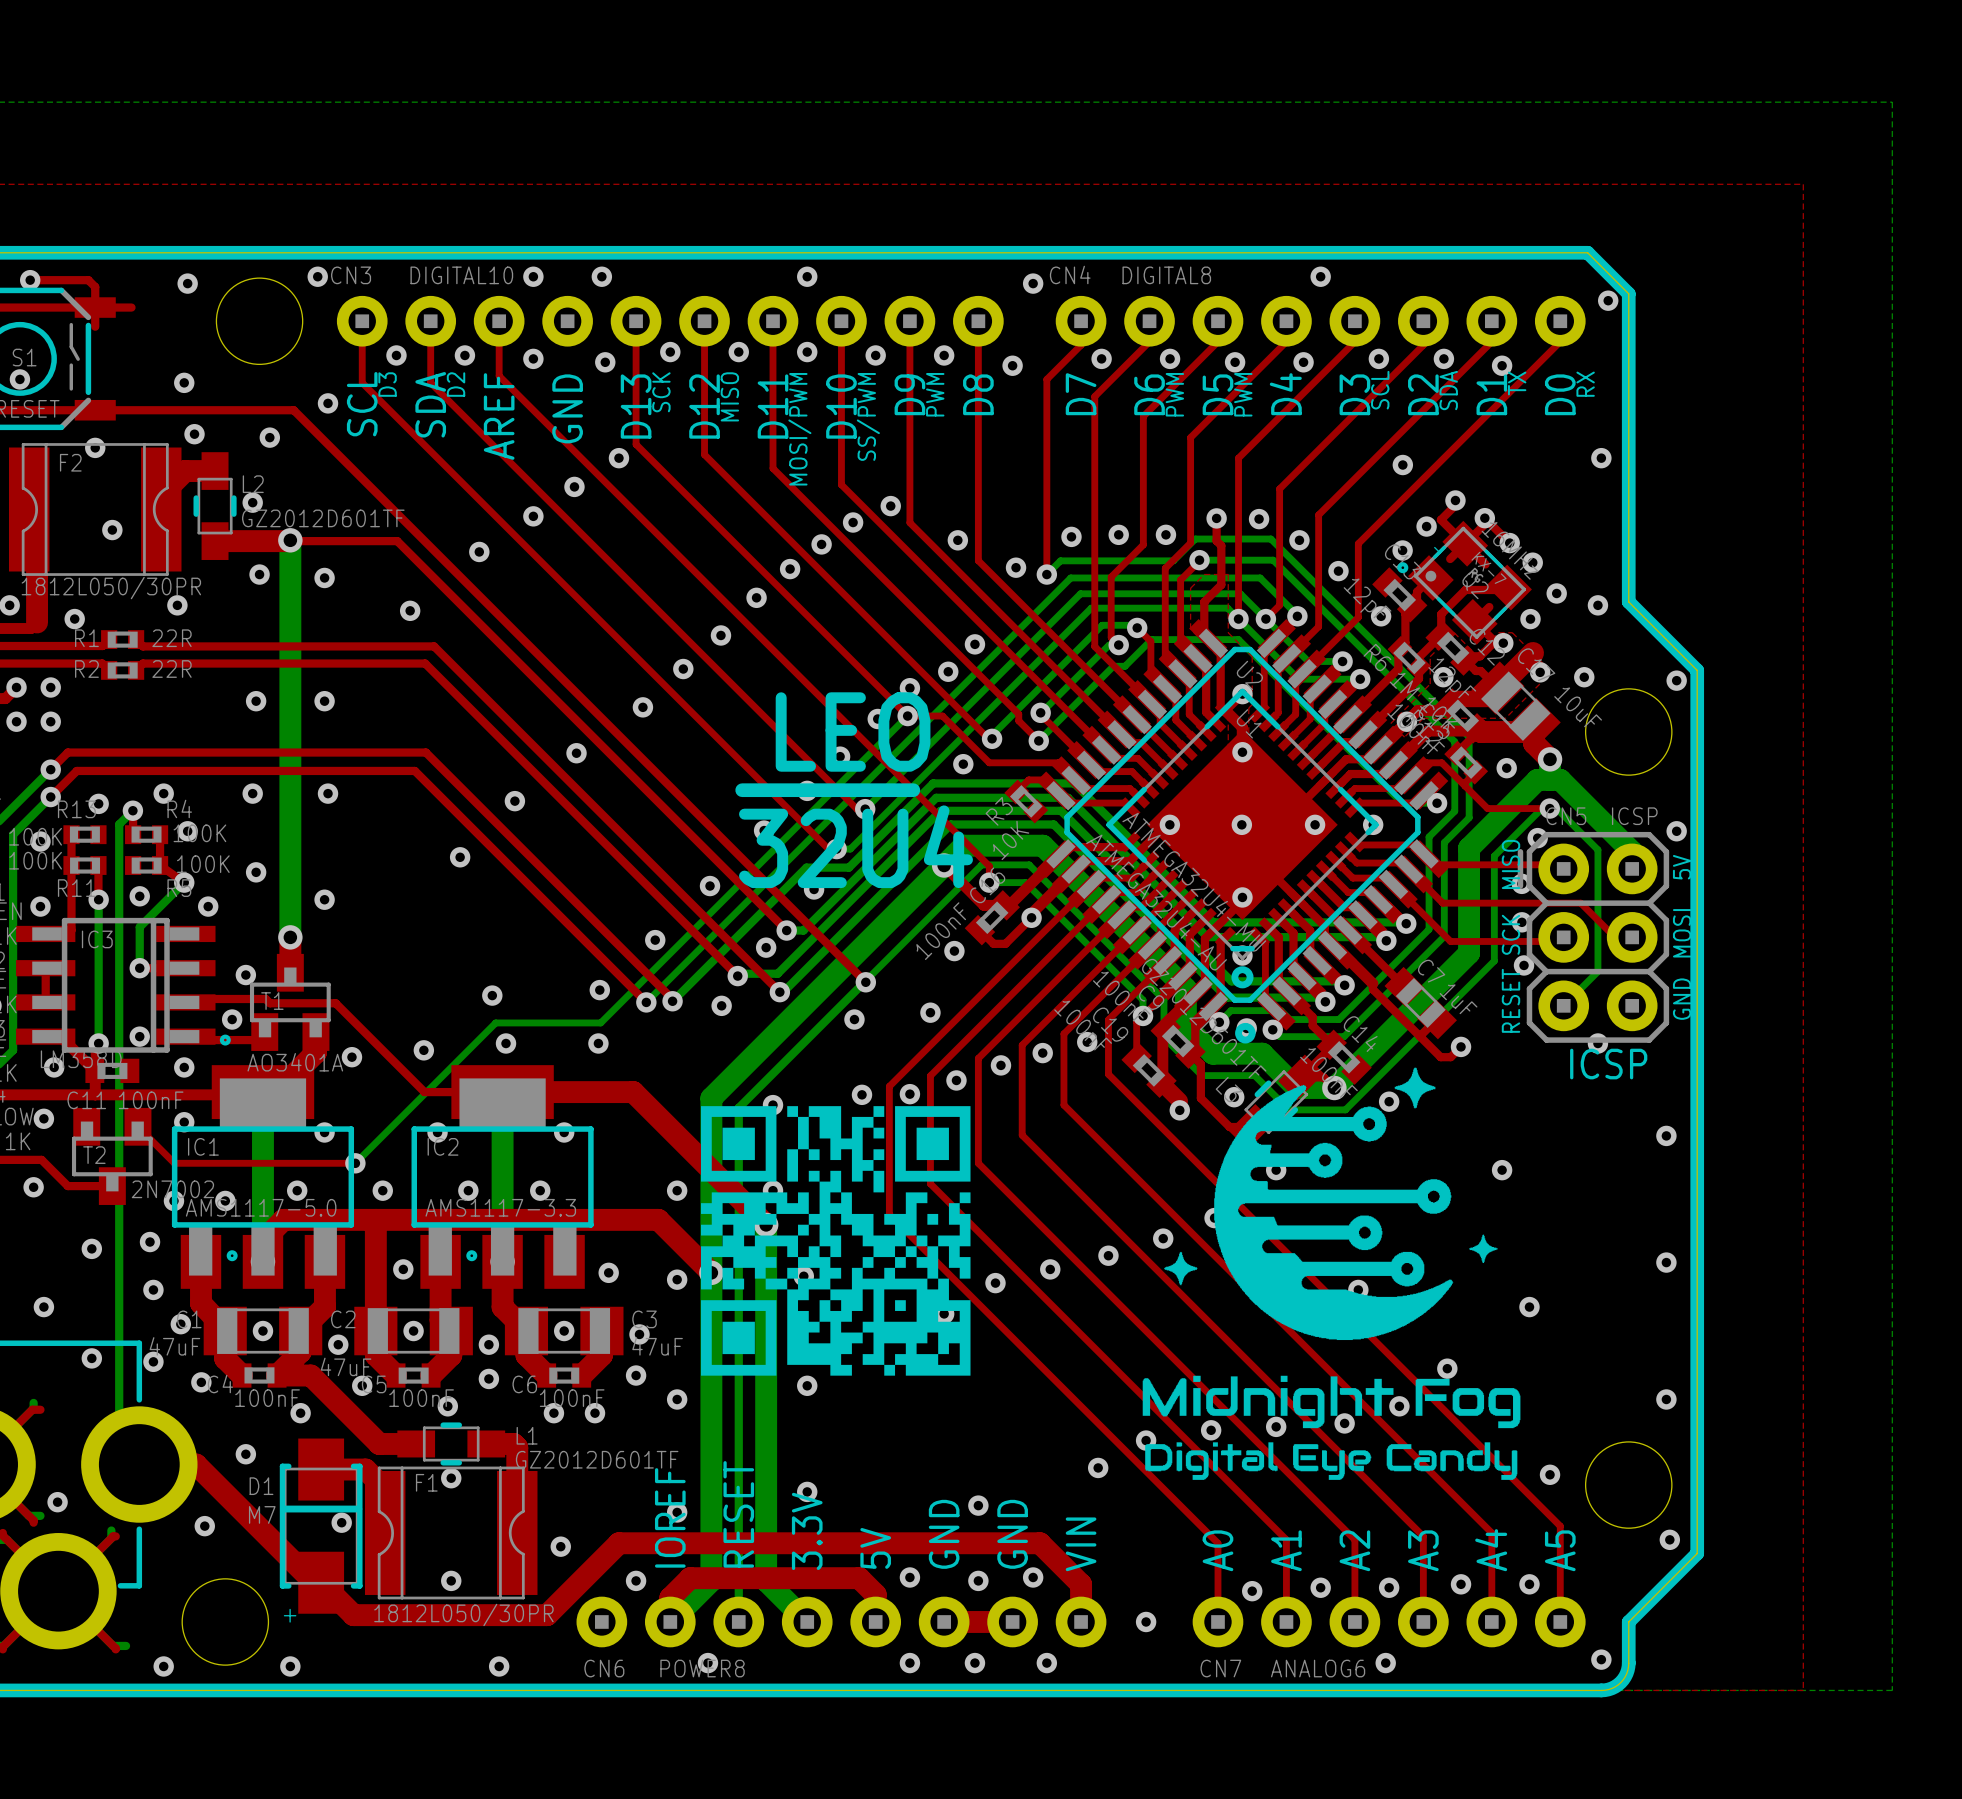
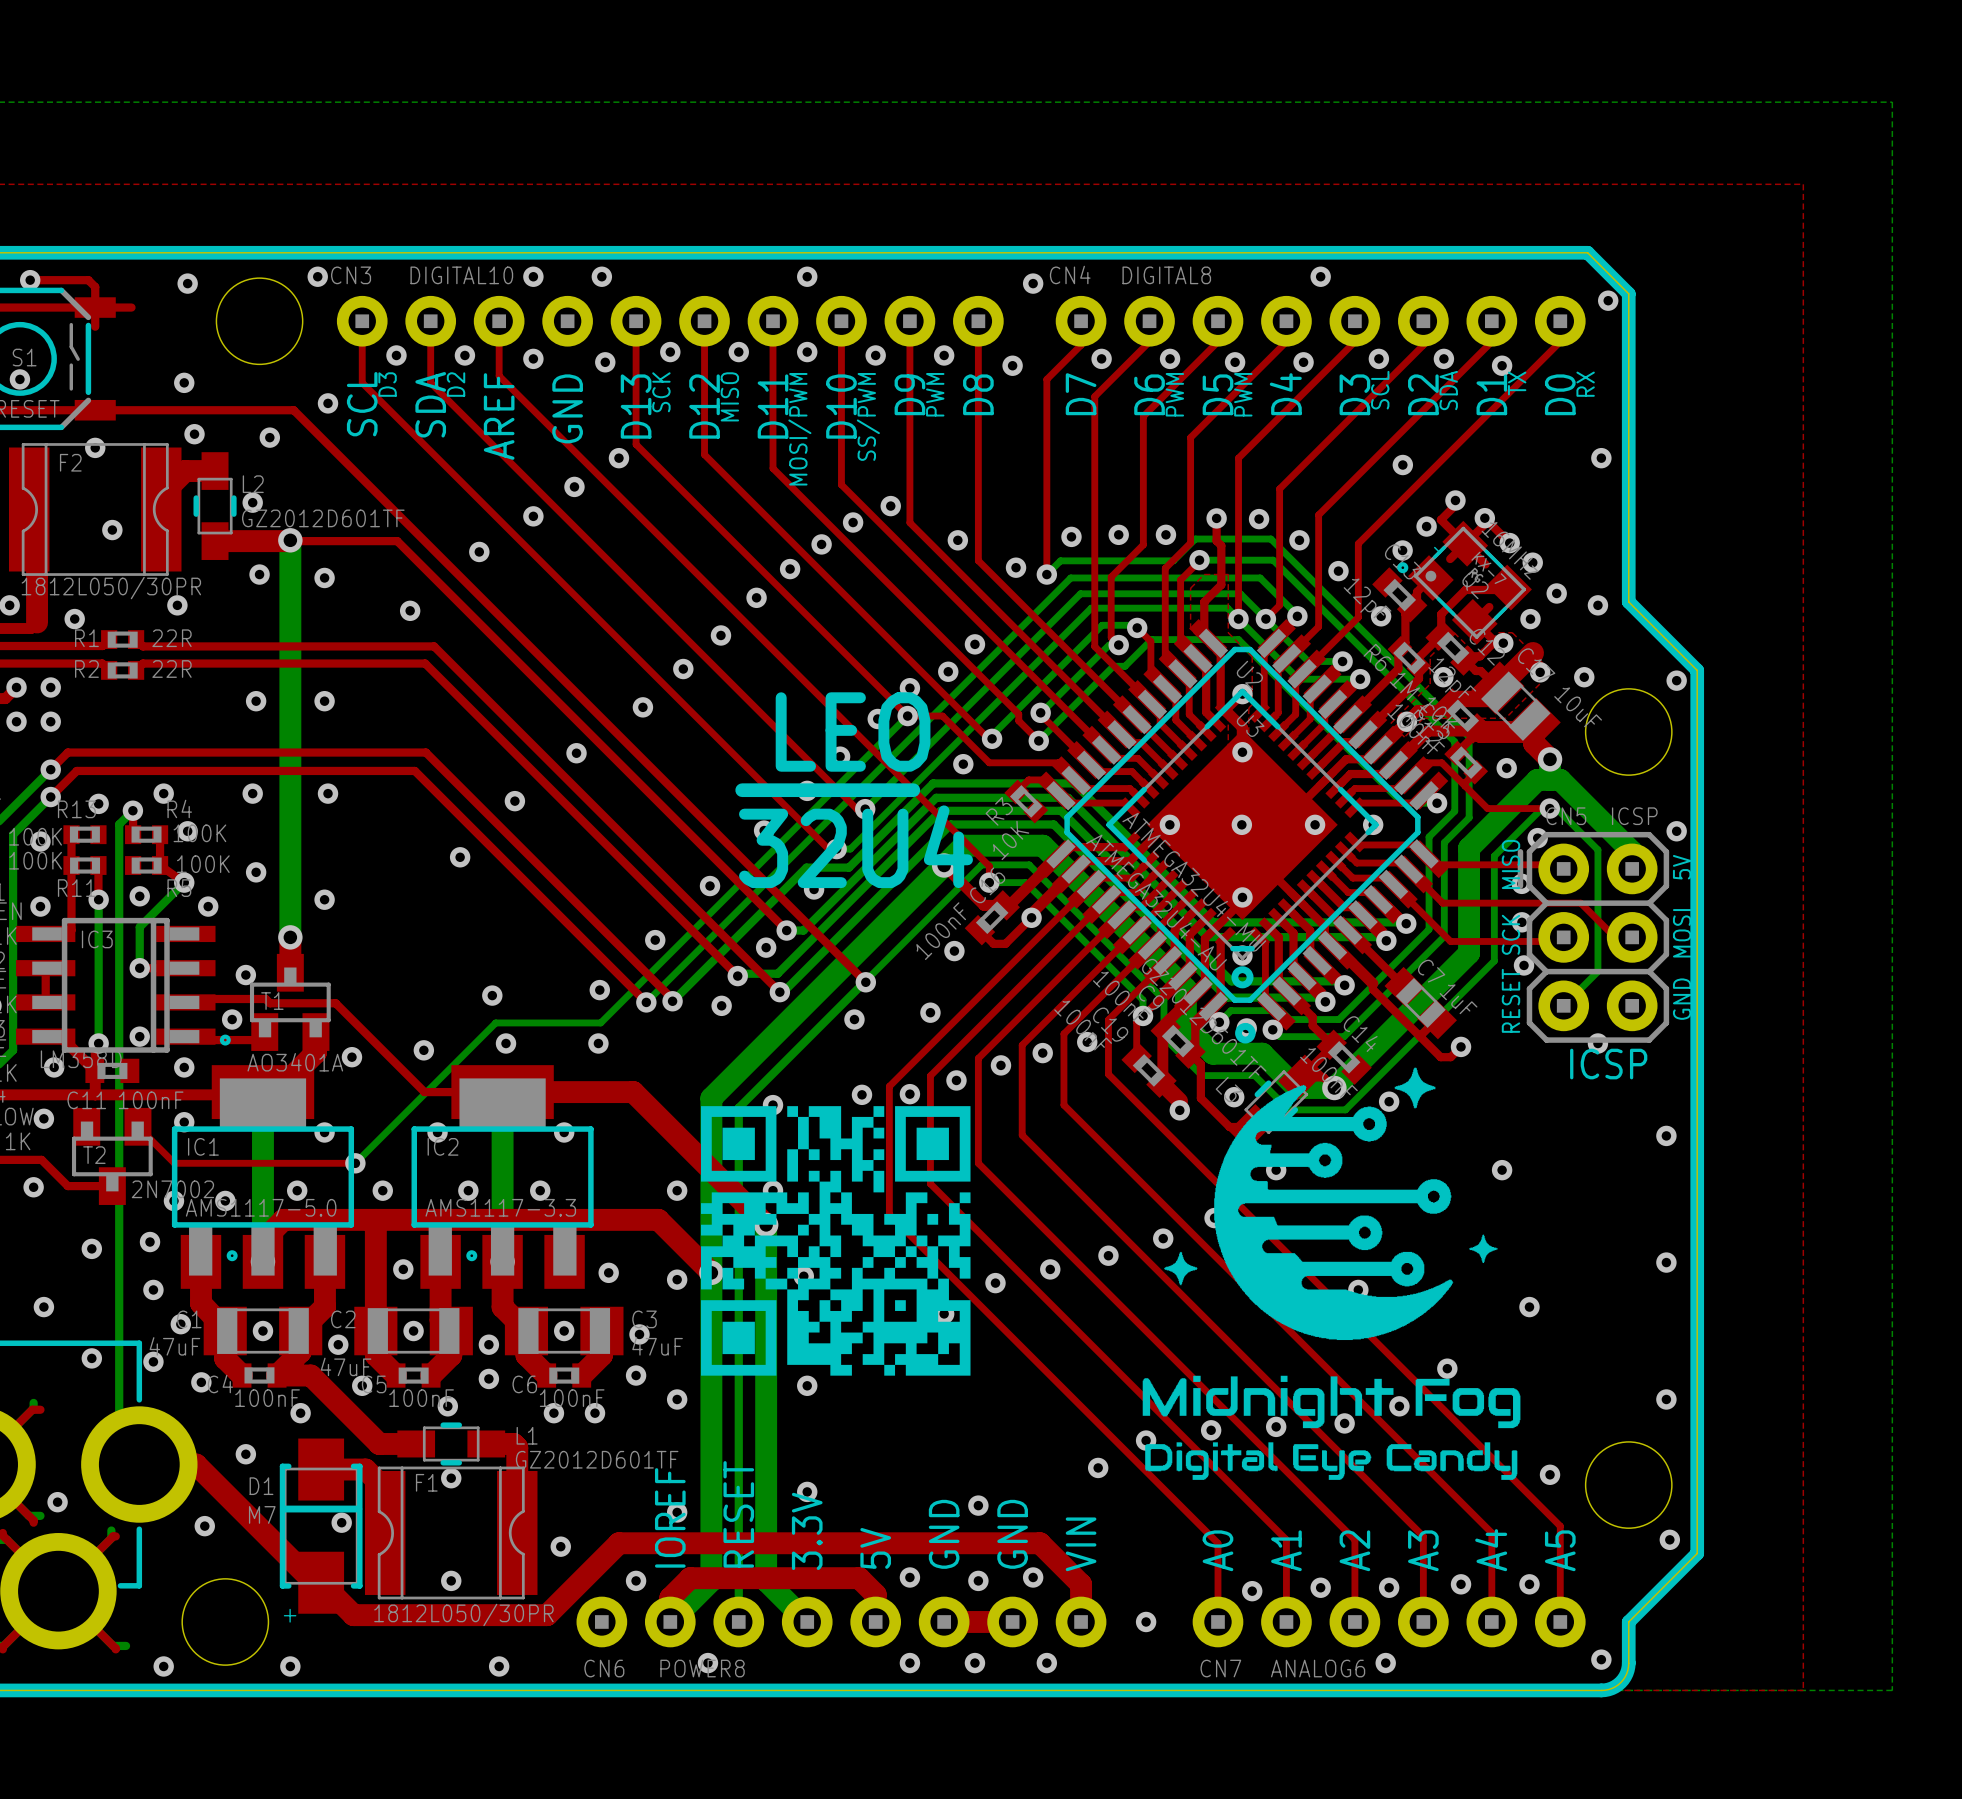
U1 name: U1 (1249, 723) -> U3 (1250, 723)

